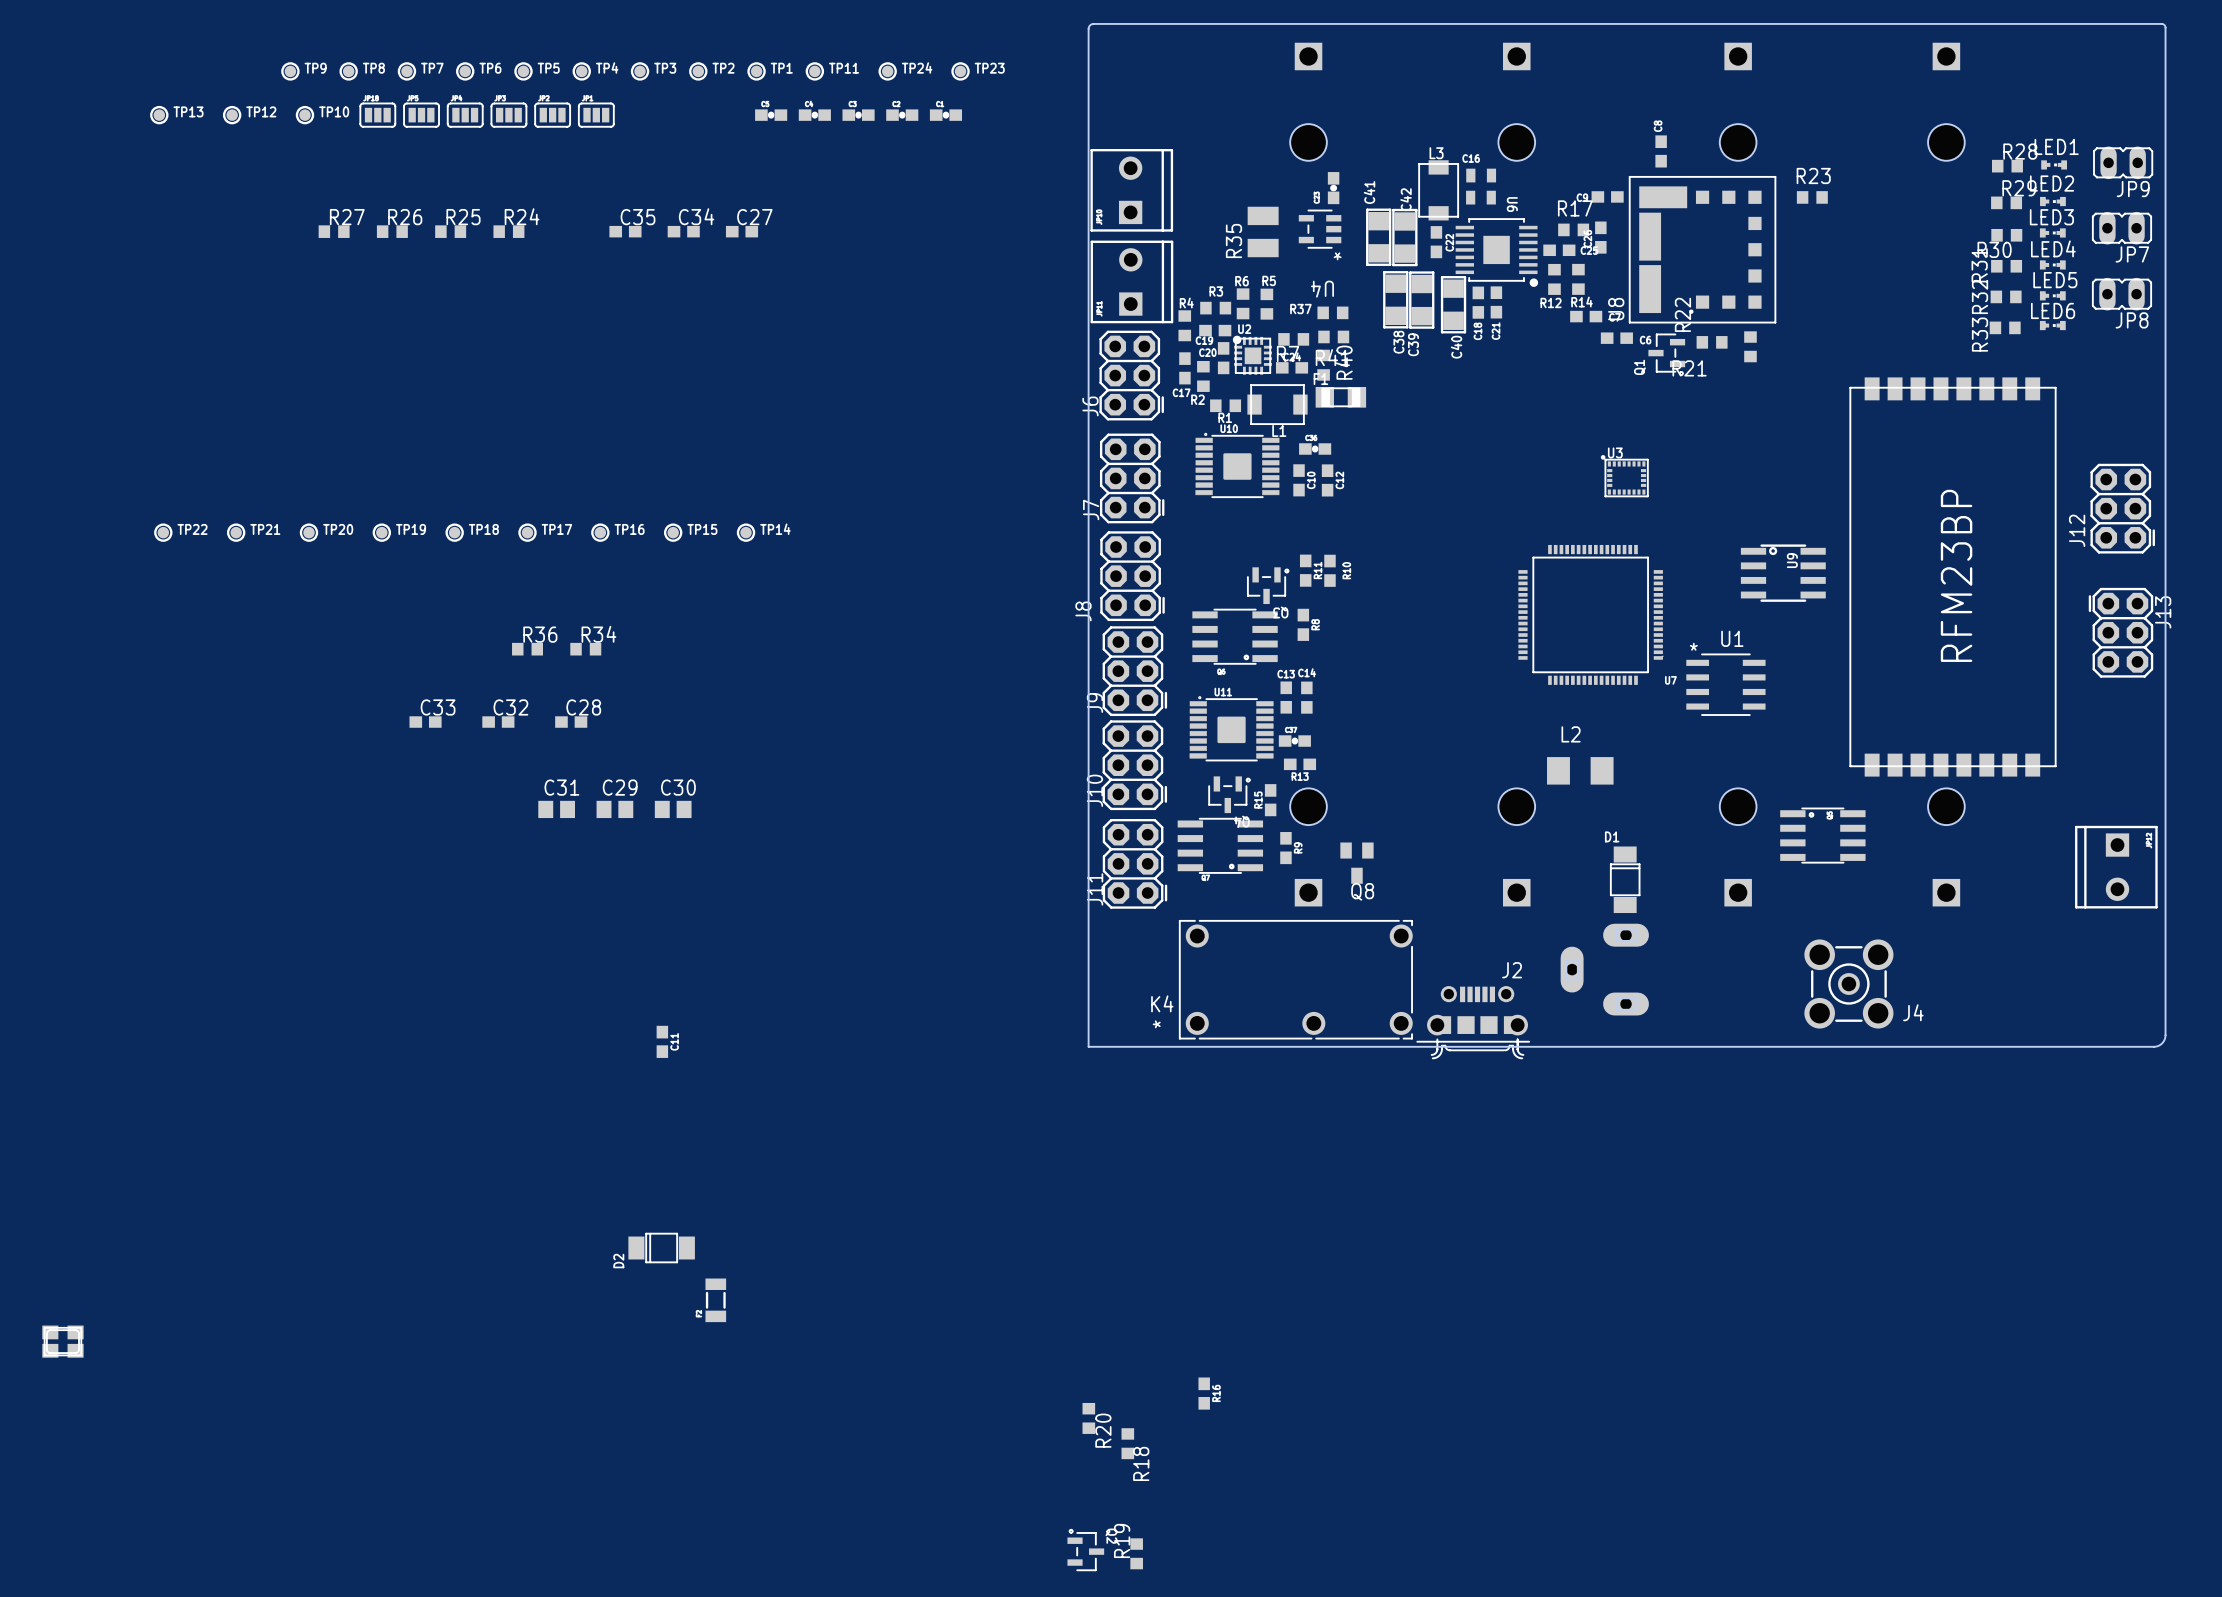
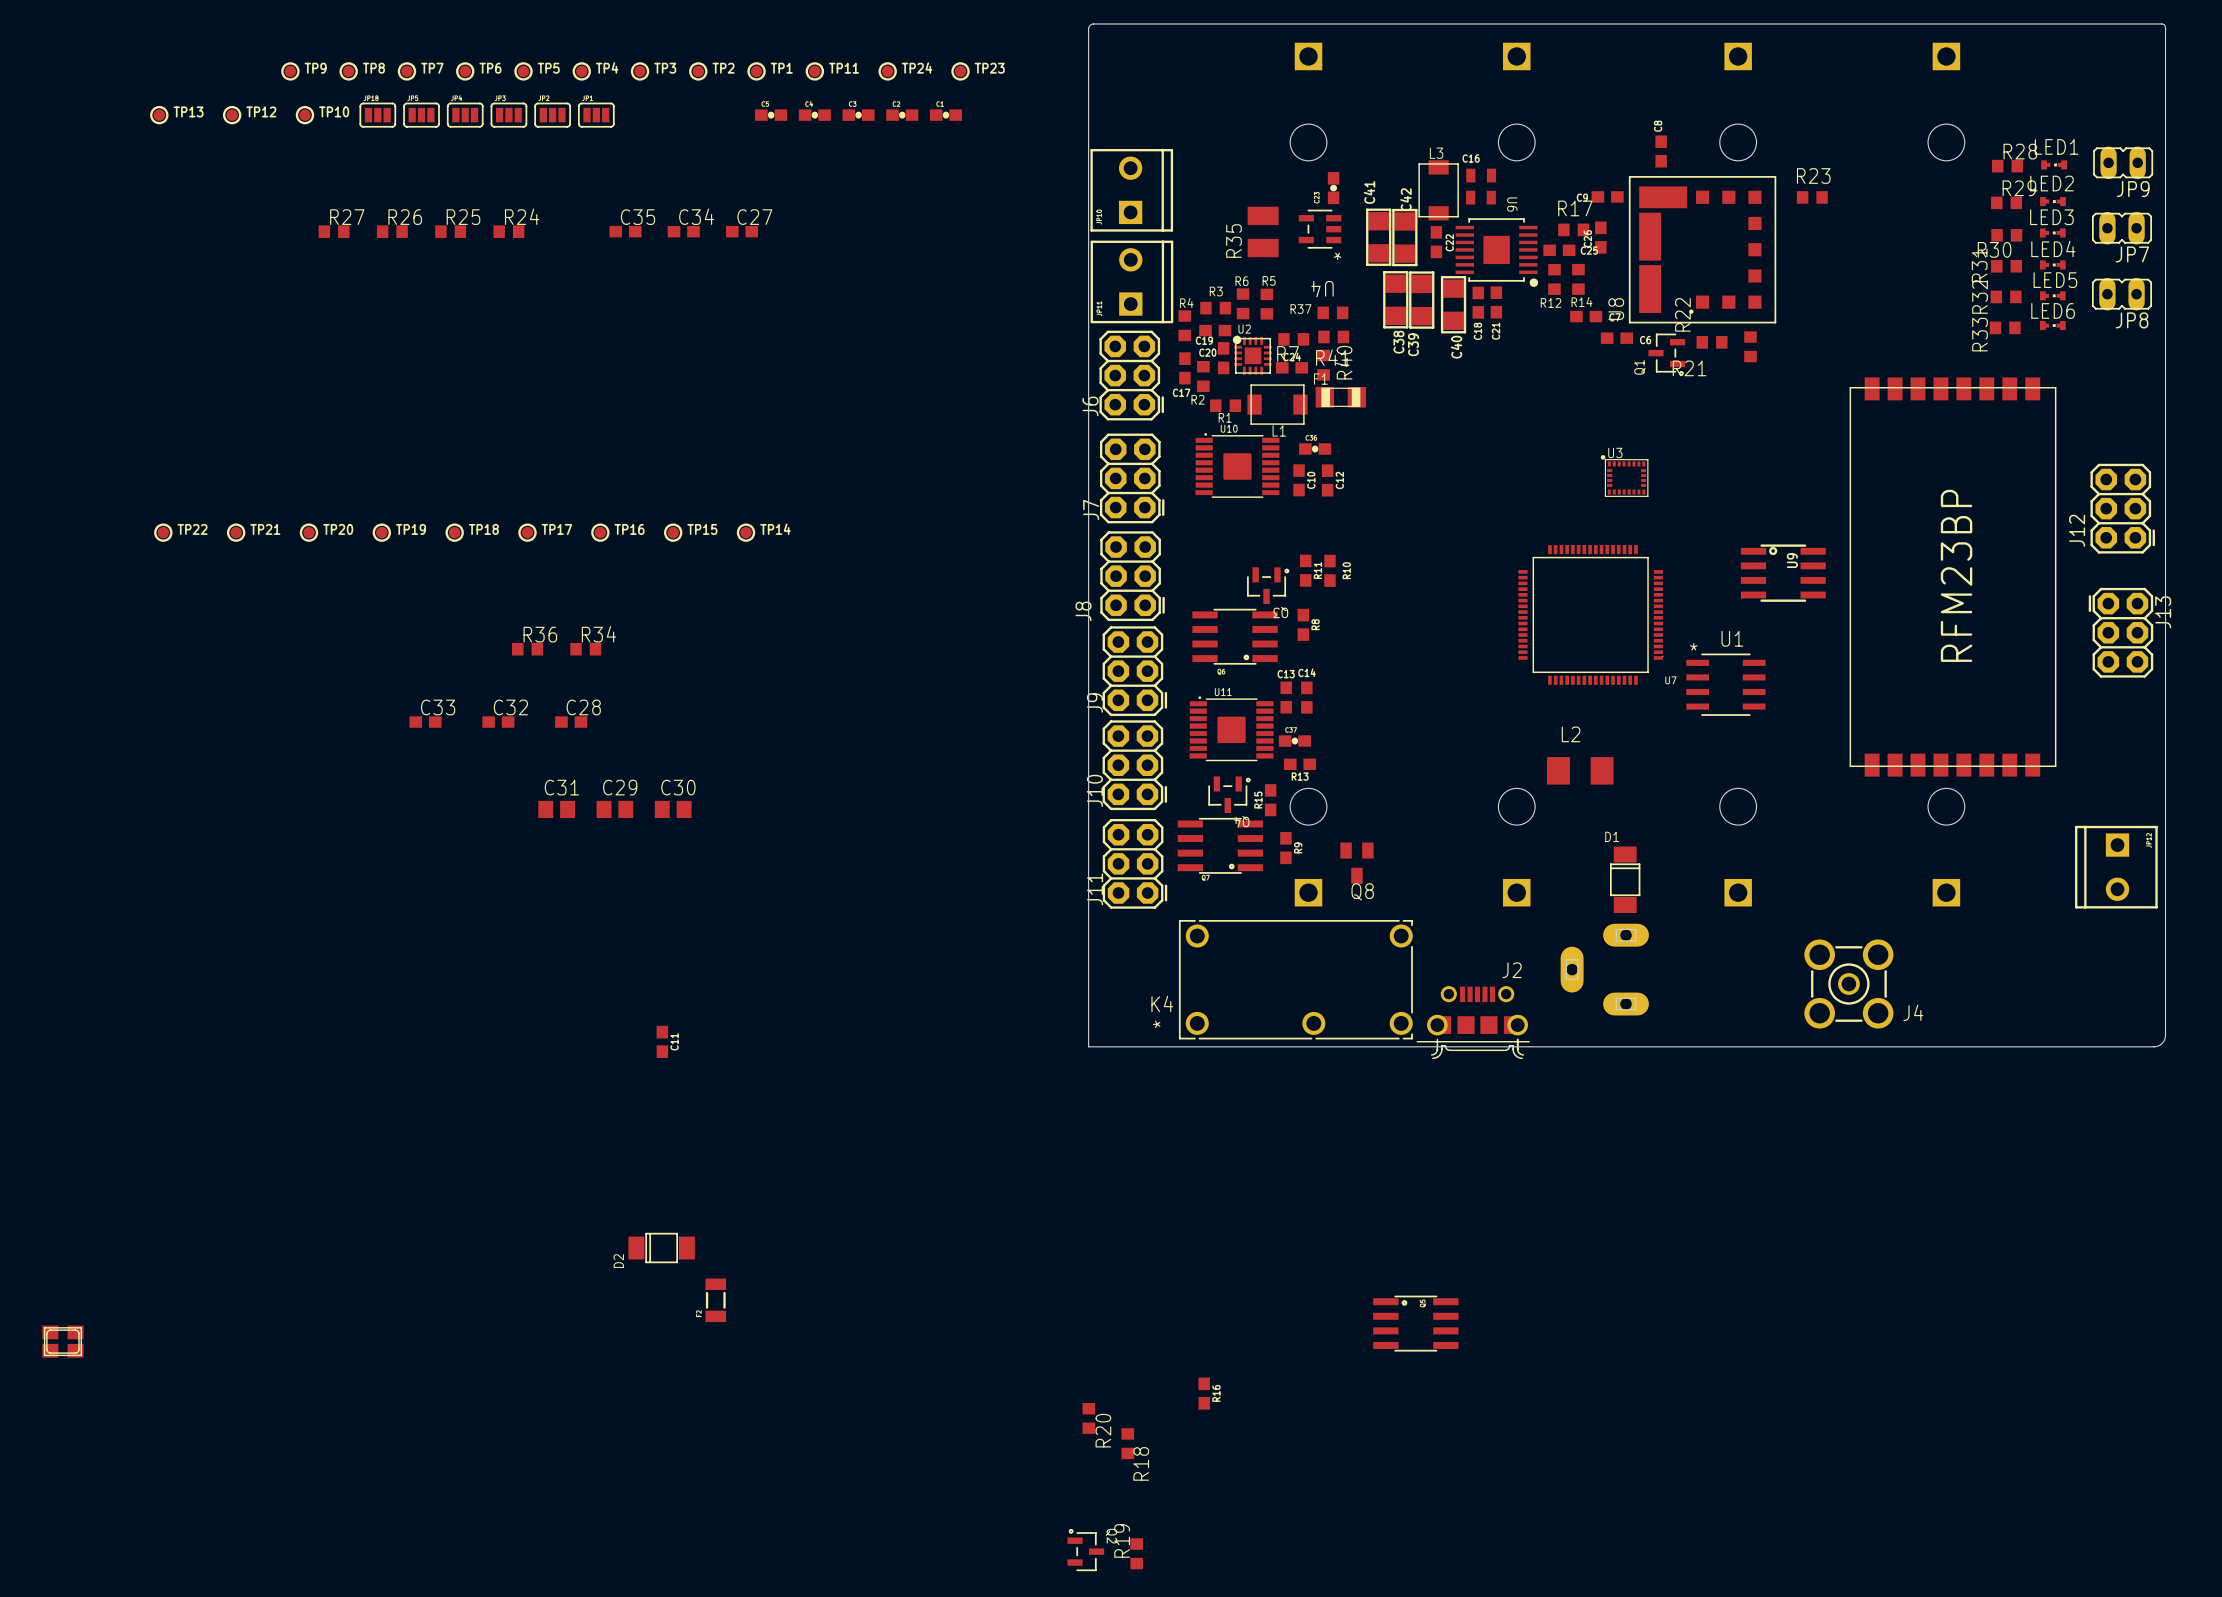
part position: (1822, 835) -> (1415, 1323)

